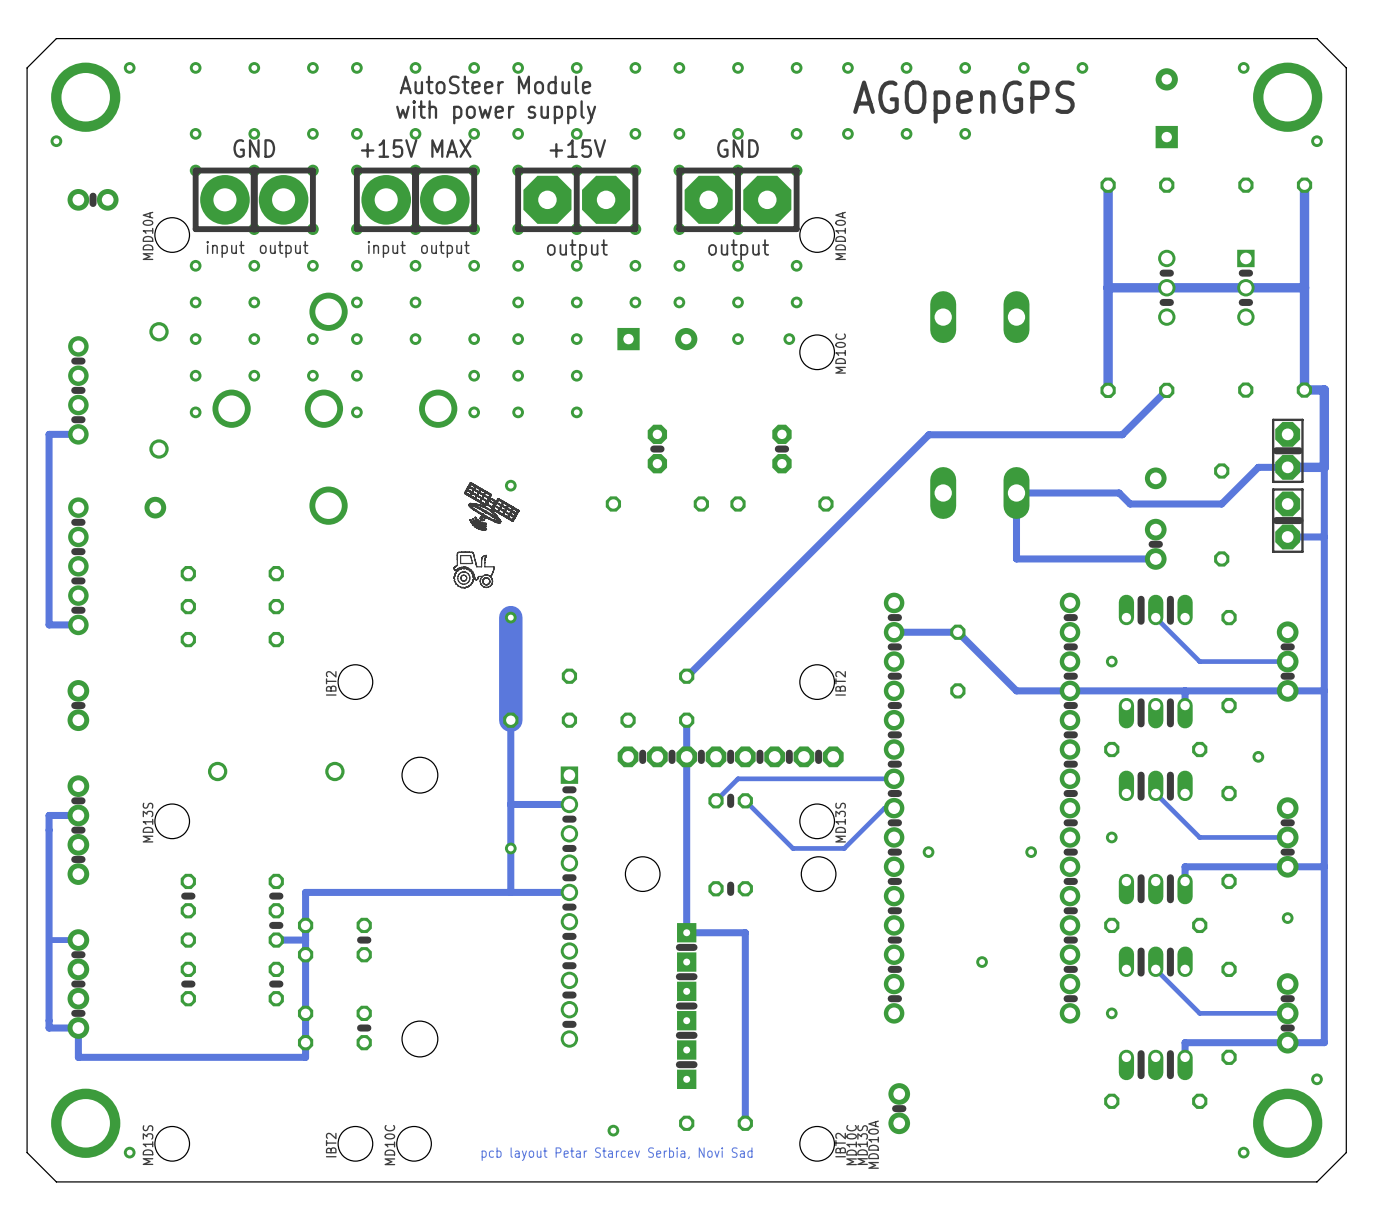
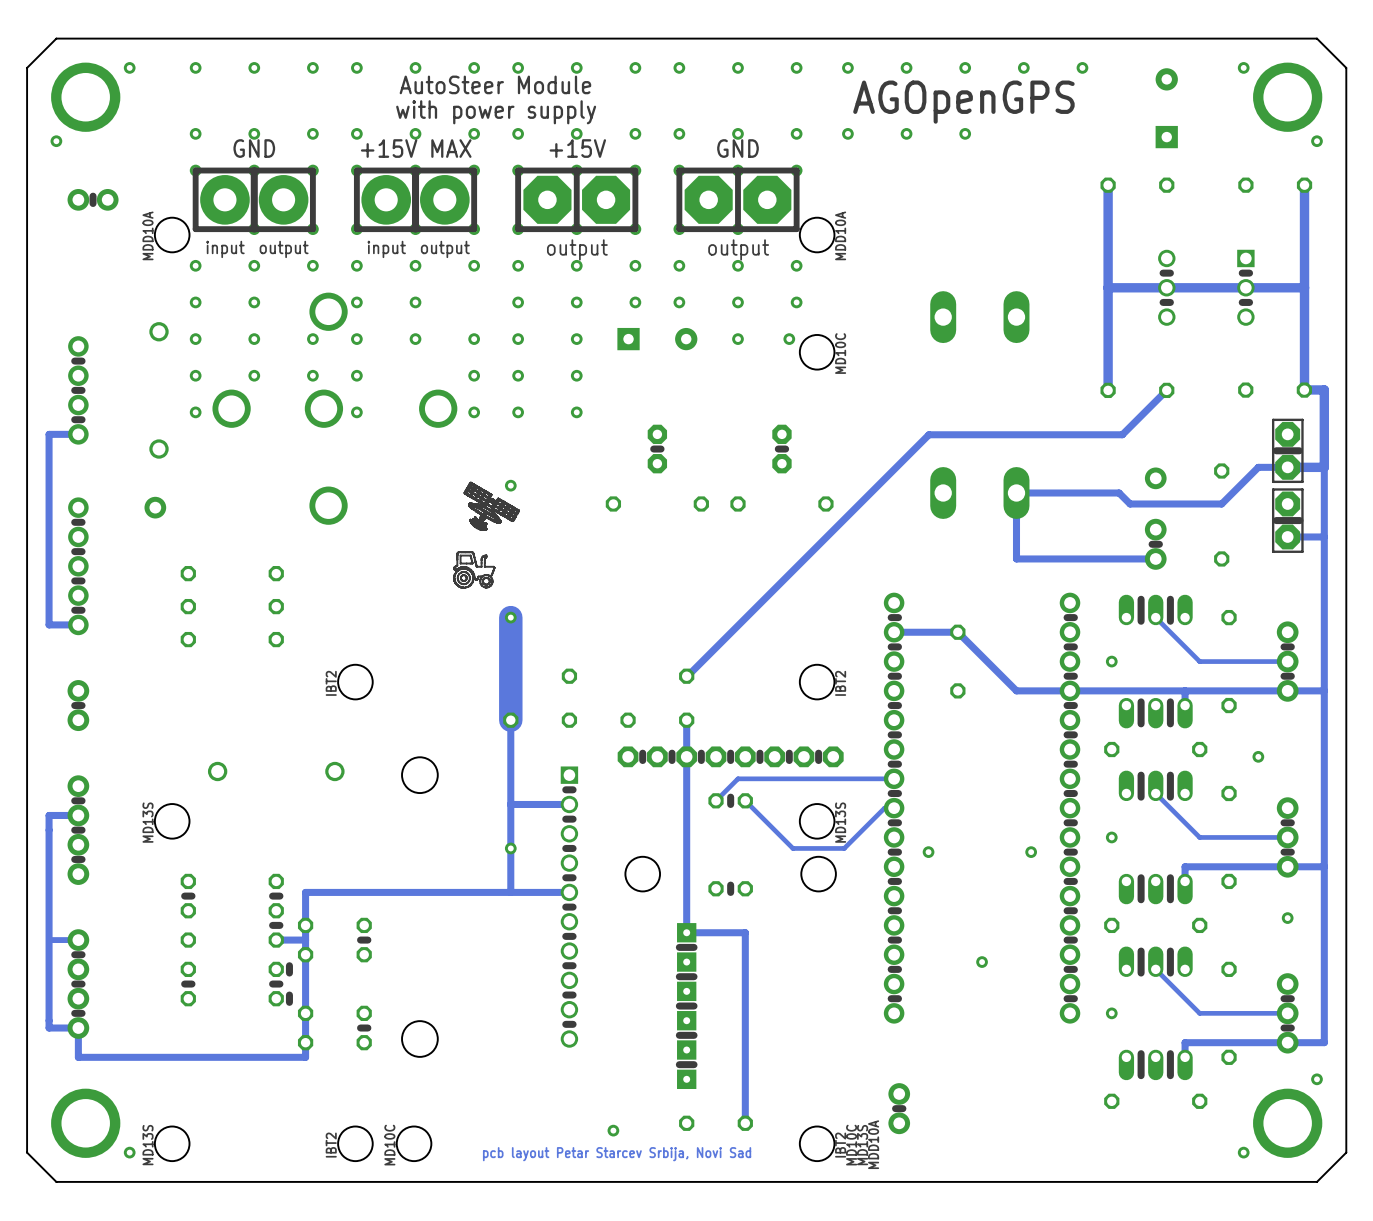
line: none -> (289, 965) (289, 973)
line: none -> (289, 995) (289, 1002)
text: pcb layout Petar Starcev Serbia, Novi Sad (617, 1154) -> pcb layout Petar Starcev Srbija, Novi Sad (617, 1154)

